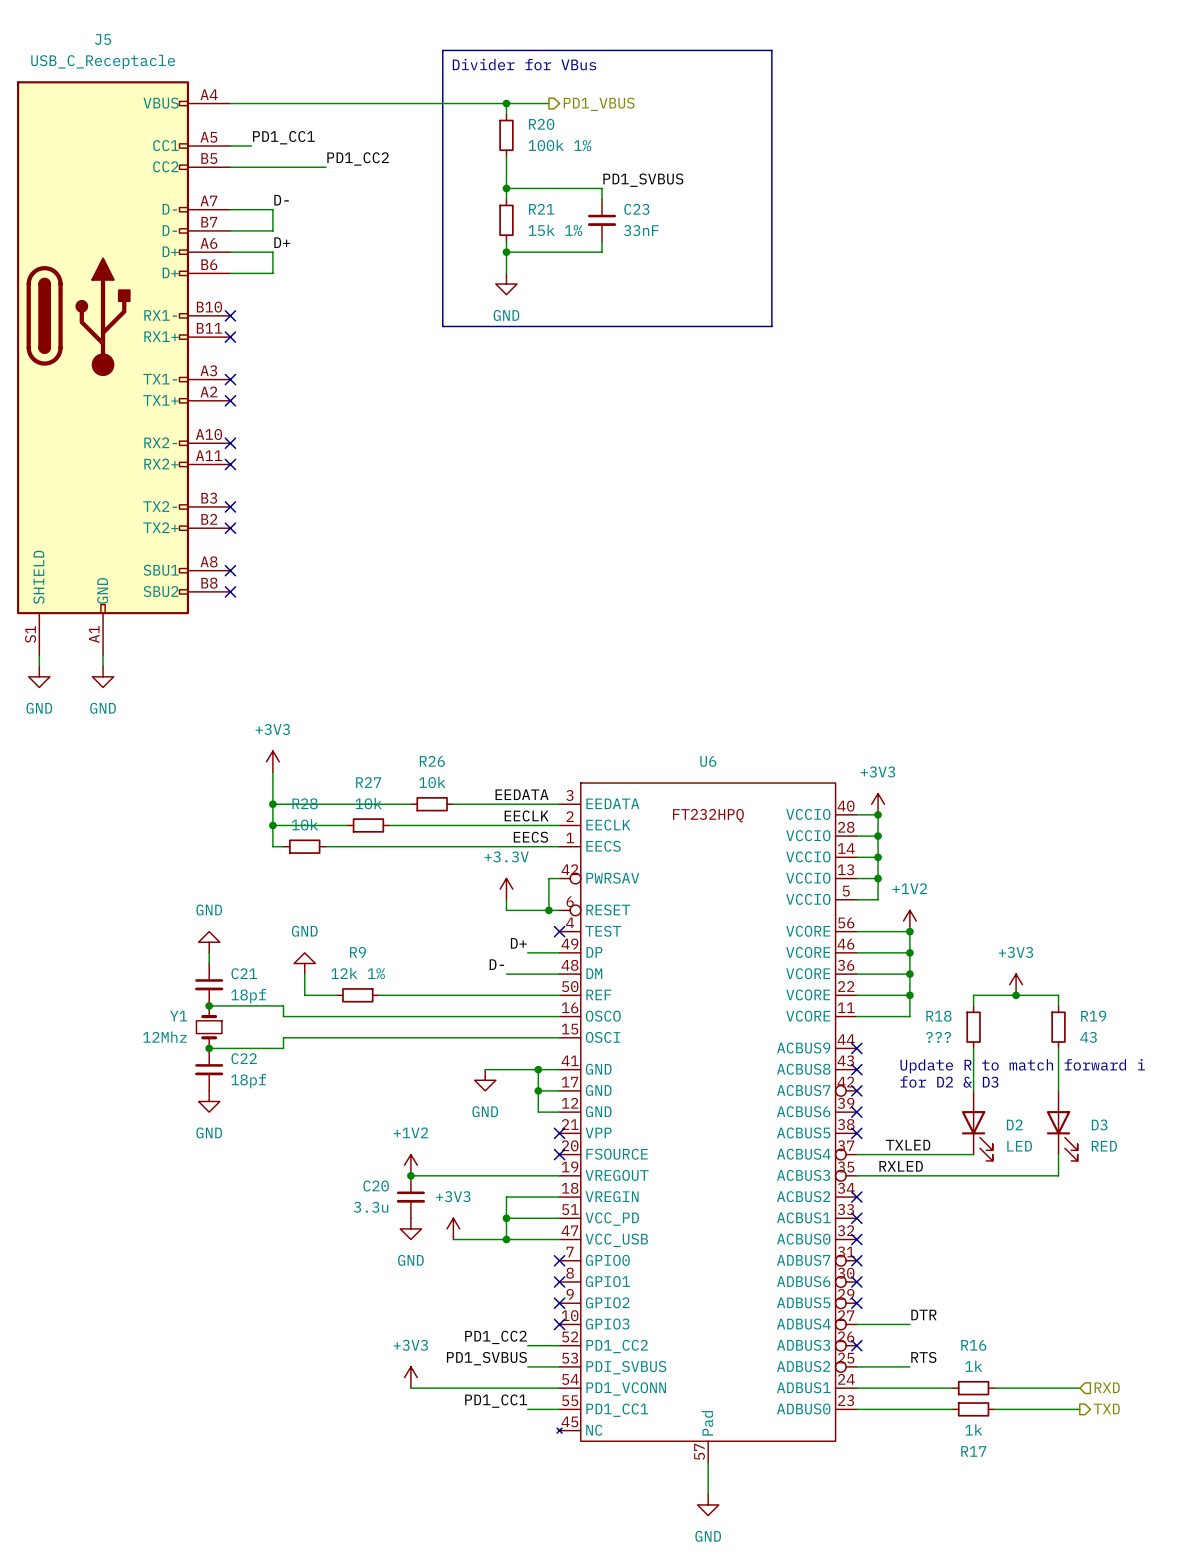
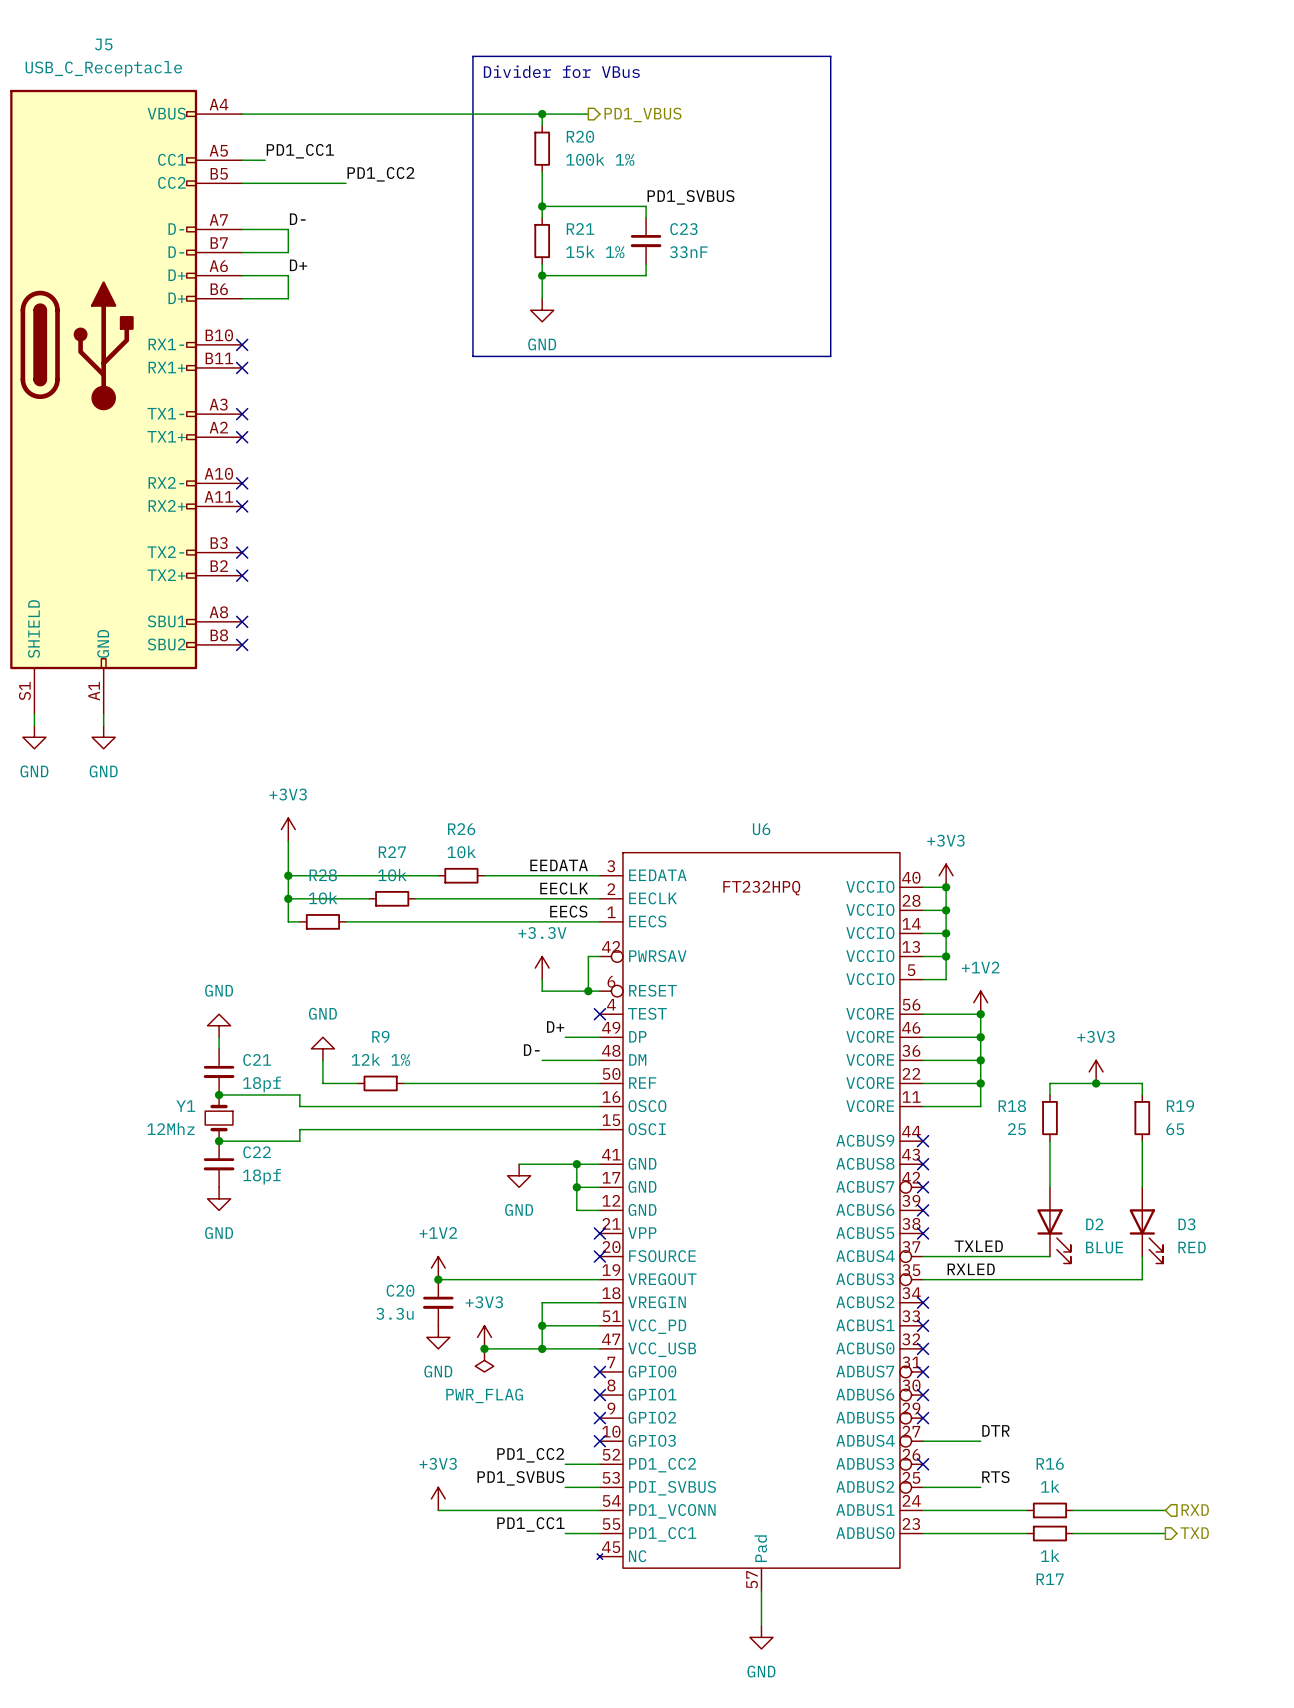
R18 value: ??? (938, 1037) -> 25 (1016, 1129)
R19 value: 43 (1088, 1037) -> 65 (1175, 1129)
text: Update R to match forward i (1022, 1066) -> none
text: for D2 & D3 (949, 1081) -> none
D2 value: LED (1019, 1146) -> BLUE (1104, 1247)
junction: none -> (484, 1348)
power symbol: none -> PWR_FLAG (484, 1360)

